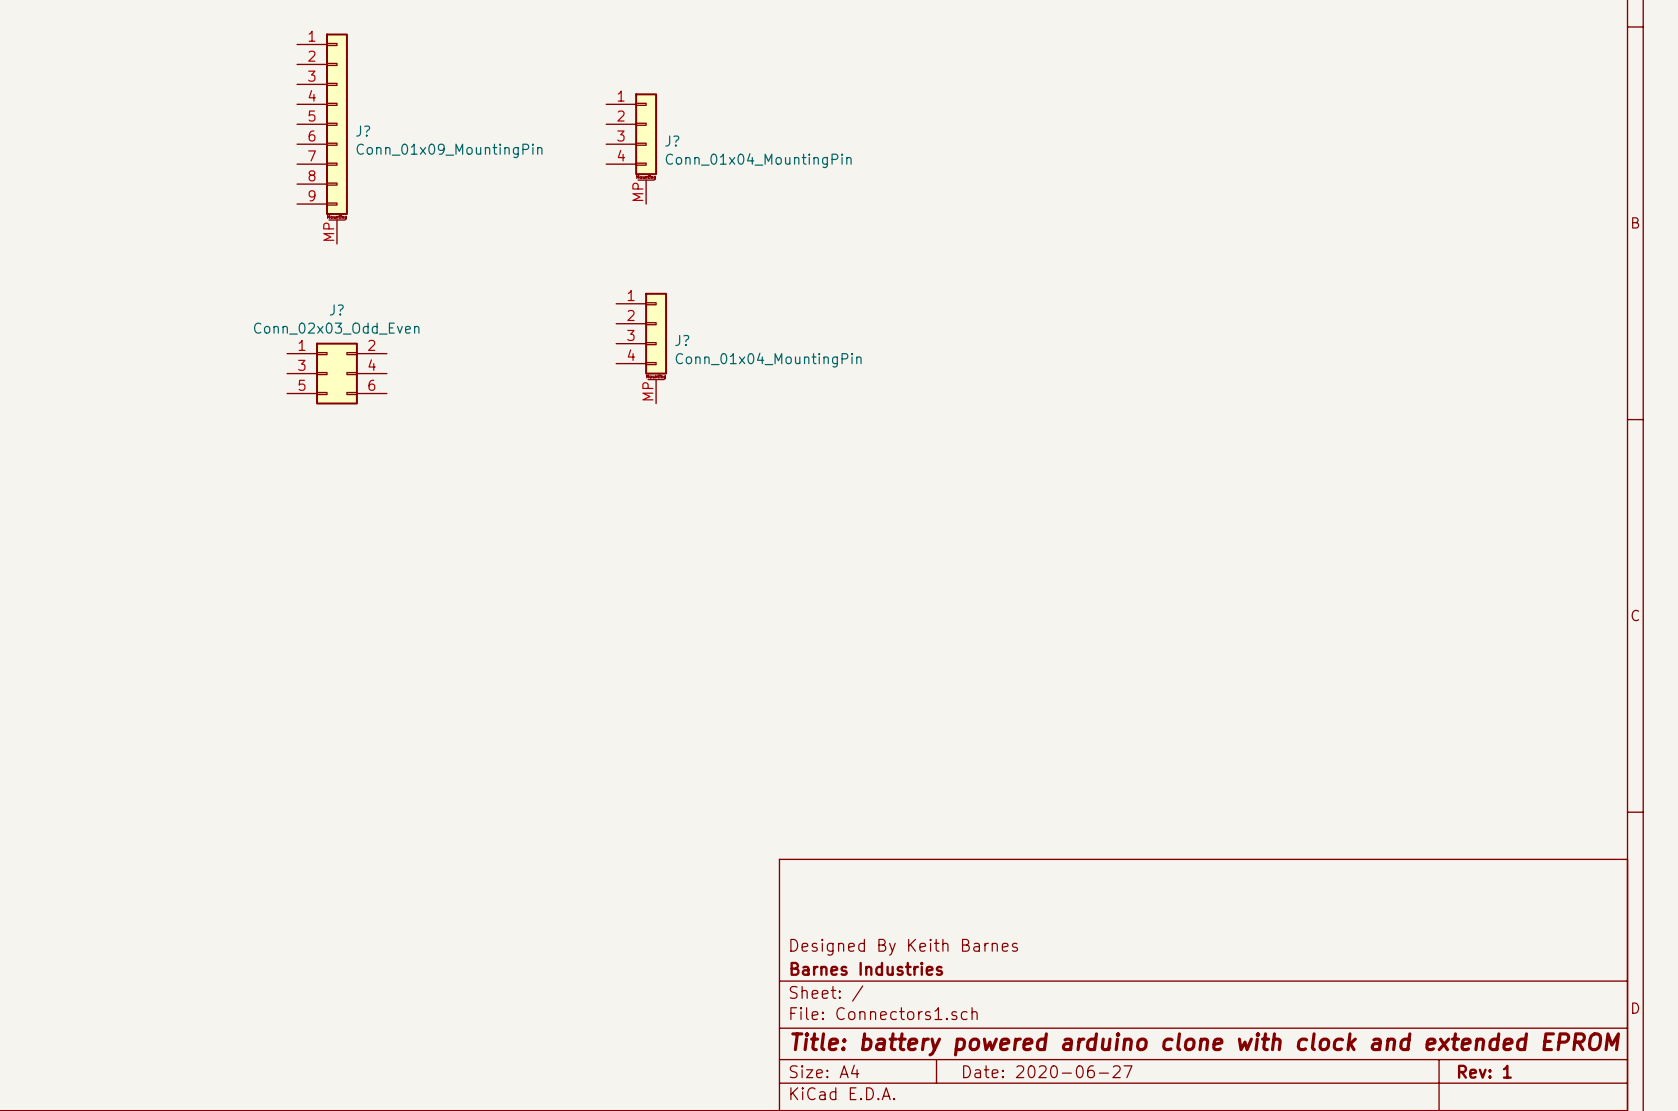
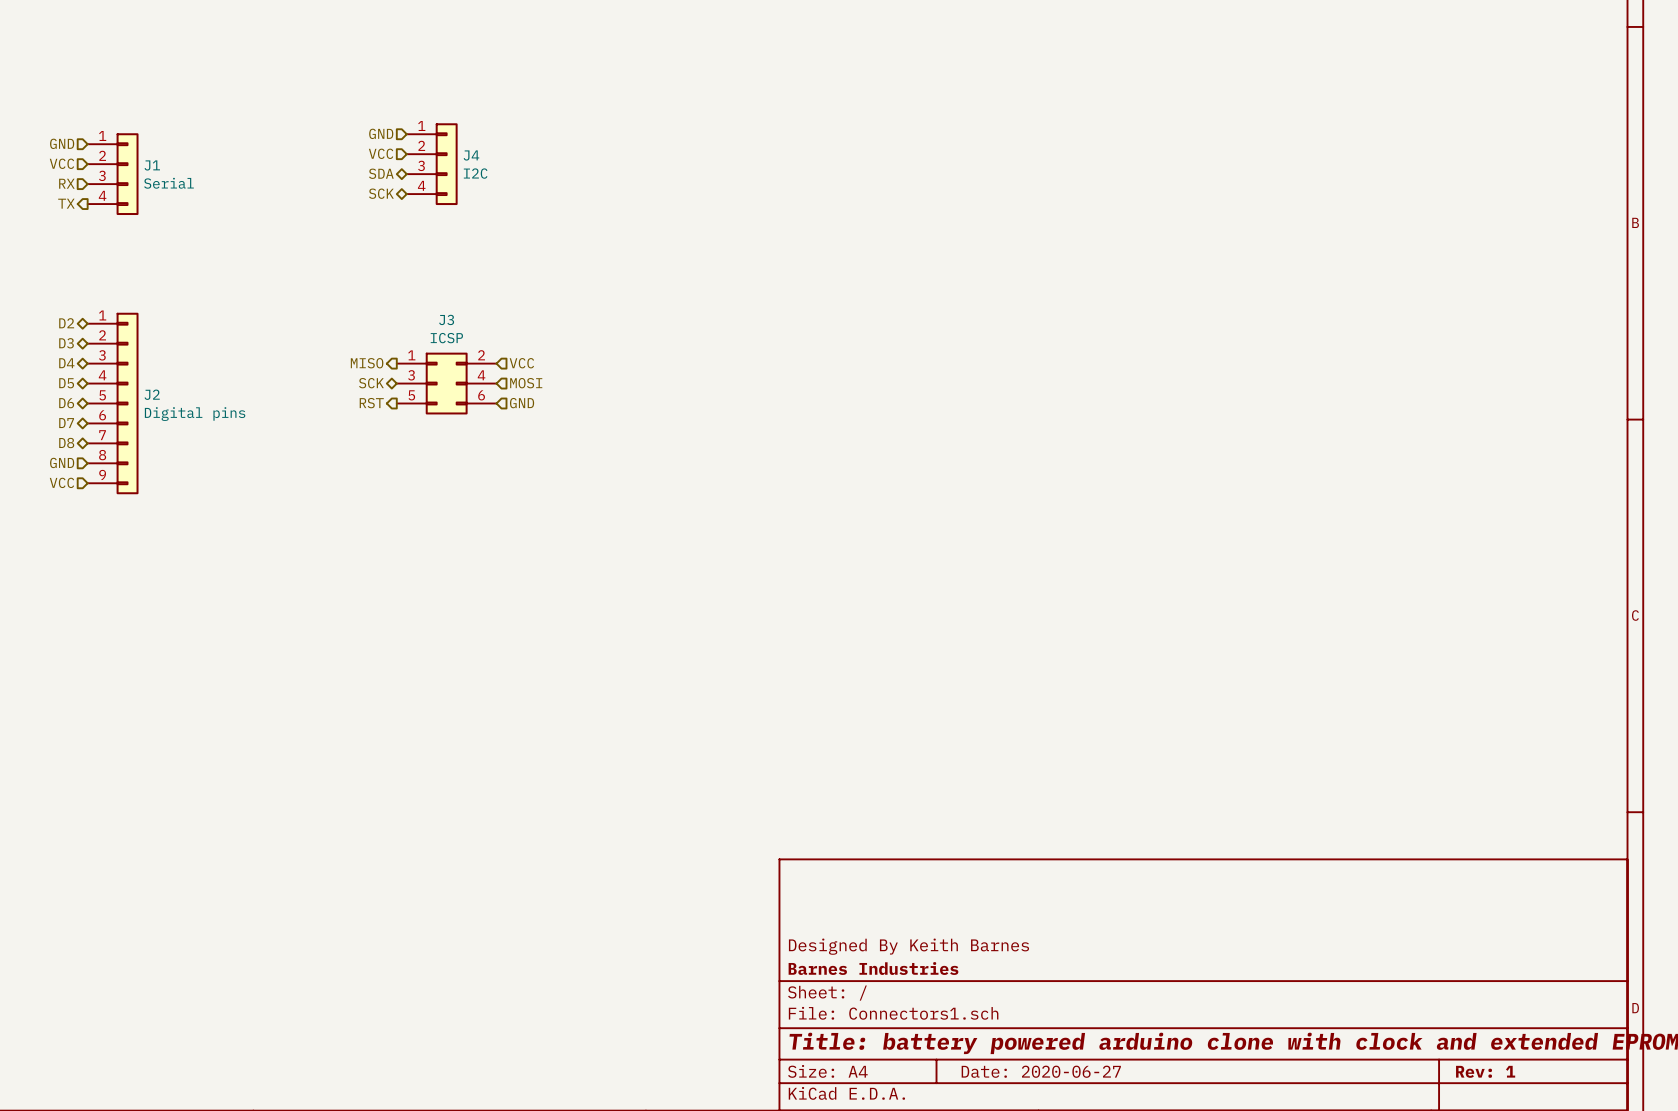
hierarchical label: none -> GND (381, 133)
J?: Conn_01x09_MountingPin (322, 138) -> none
hierarchical label: none -> GND (62, 143)
J?: Conn_01x04_MountingPin (631, 148) -> none
hierarchical label: none -> VCC (381, 153)
hierarchical label: none -> VCC (61, 163)
J4: none -> I2C (432, 164)
hierarchical label: none -> SDA (381, 173)
J1: none -> Serial (113, 174)
hierarchical label: none -> RX (66, 183)
hierarchical label: none -> SCK (381, 193)
hierarchical label: none -> TX (66, 203)
hierarchical label: none -> D2 (66, 323)
hierarchical label: none -> D3 (66, 343)
J?: Conn_01x04_MountingPin (641, 348) -> none
hierarchical label: none -> D4 (66, 363)
hierarchical label: none -> MISO (367, 363)
hierarchical label: none -> VCC (521, 363)
J?: Conn_02x03_Odd_Even (336, 373) -> none
hierarchical label: none -> D5 (66, 383)
hierarchical label: none -> SCK (371, 383)
J3: none -> ICSP (446, 383)
hierarchical label: none -> MOSI (526, 383)
hierarchical label: none -> D6 (66, 403)
J2: none -> Digital pins (113, 403)
hierarchical label: none -> RST (371, 403)
hierarchical label: none -> GND (522, 403)
hierarchical label: none -> D7 (66, 423)
hierarchical label: none -> D8 (66, 443)
hierarchical label: none -> GND (62, 462)
hierarchical label: none -> VCC (61, 482)

